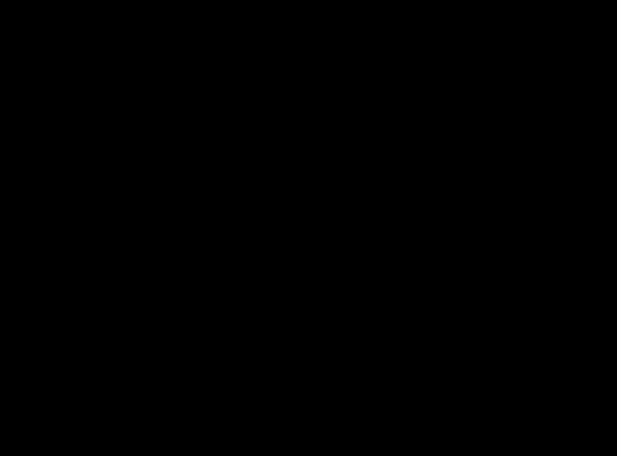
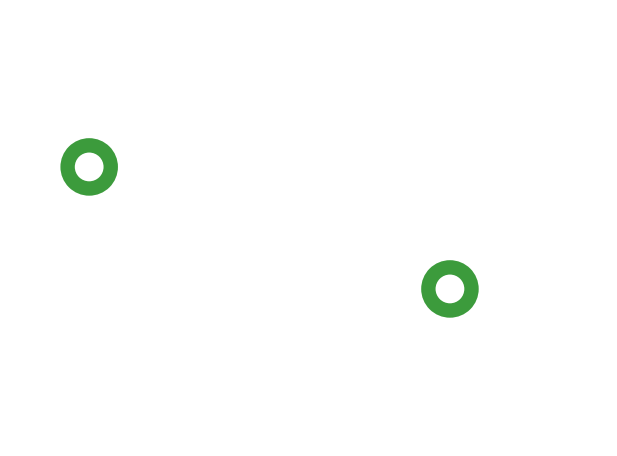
via: none -> (89, 166)
via: none -> (449, 288)

